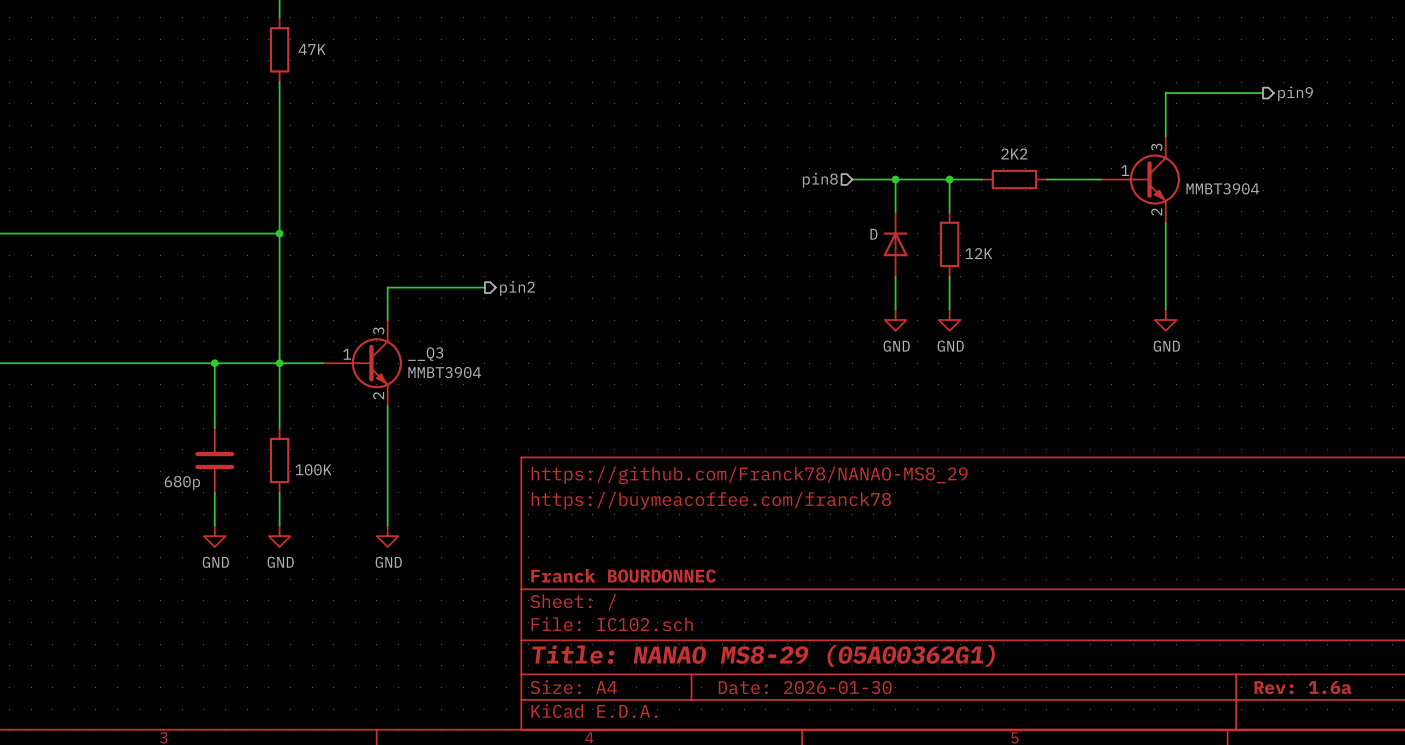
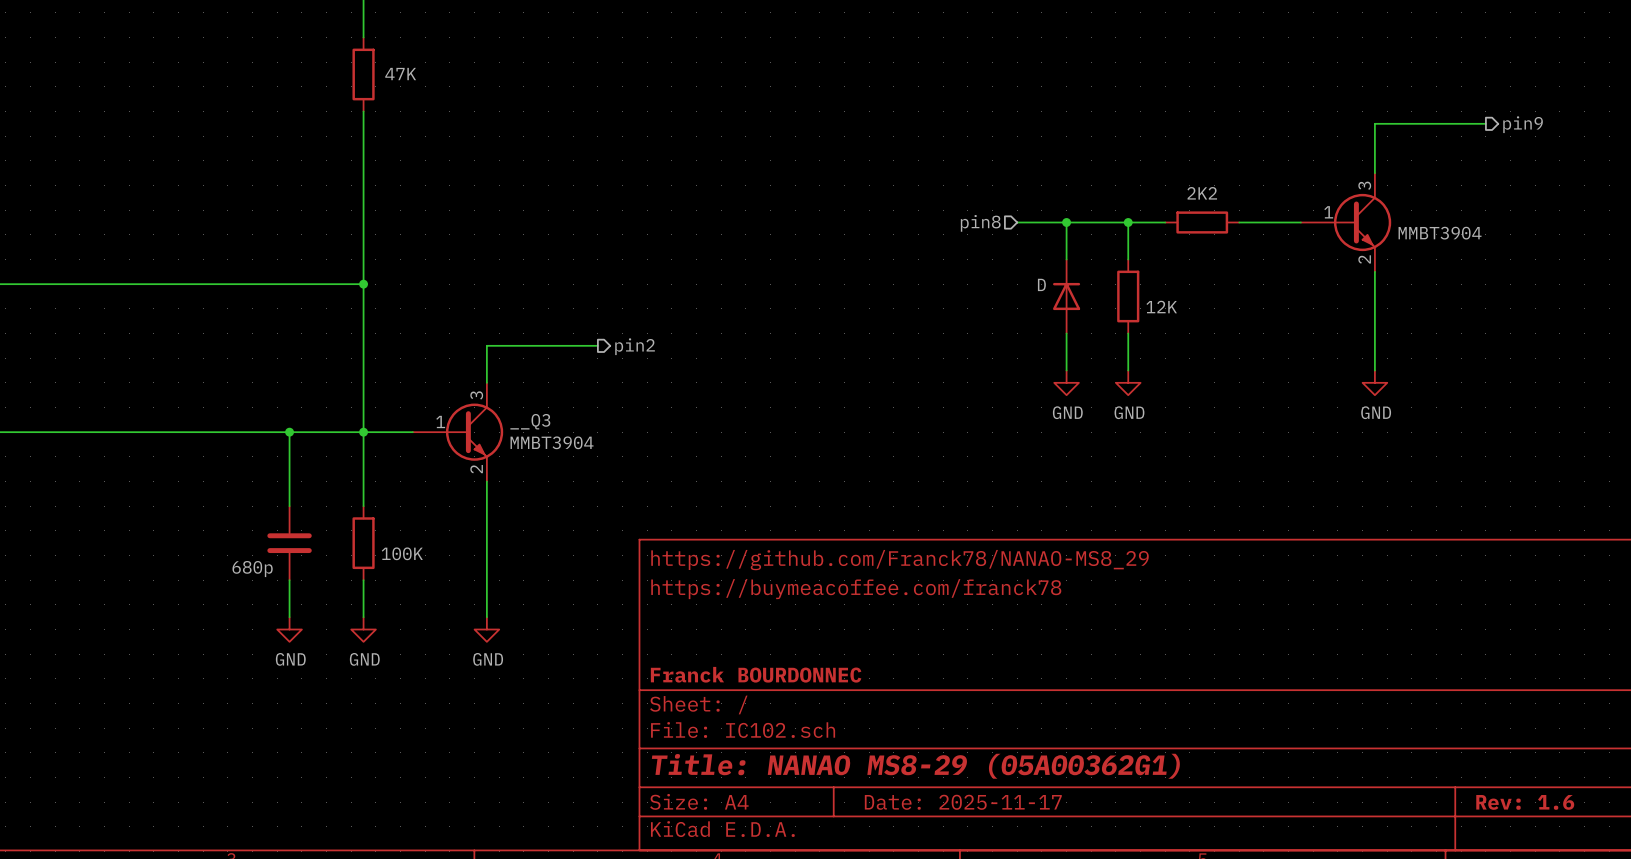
title block: Date: 2026-01-30 (805, 687) -> Date: 2025-11-17 (963, 802)
title block: Rev: 1.6a (1302, 687) -> Rev: 1.6 (1525, 802)

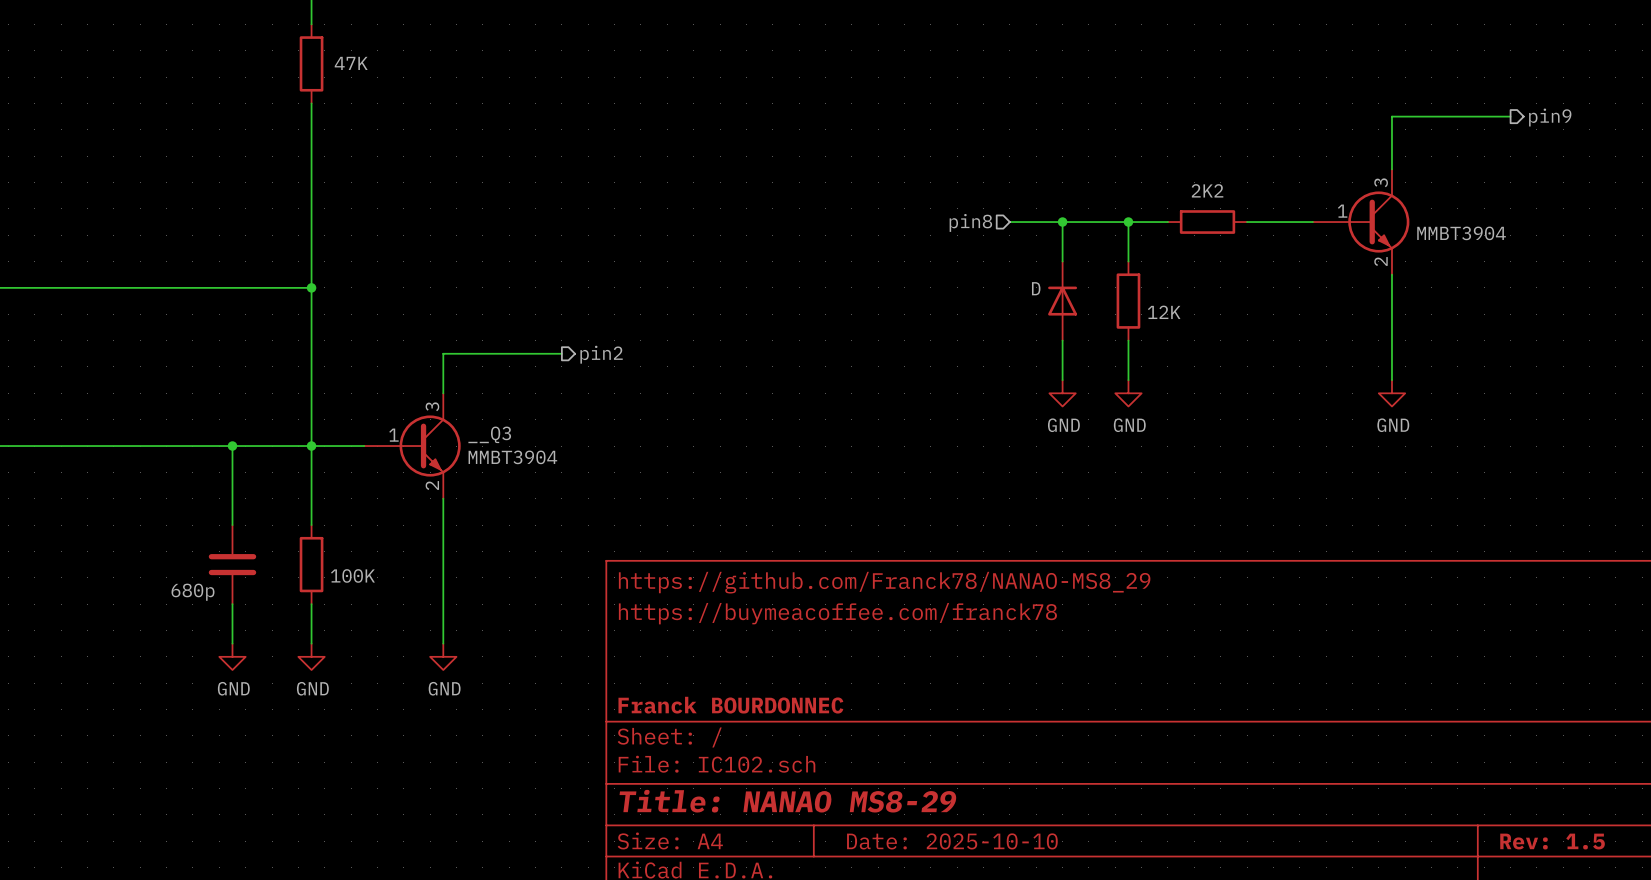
title block: Title: NANAO MS8-29 (05A00362G1) (915, 766) -> Title: NANAO MS8-29 (787, 801)
title block: Date: 2025-11-17 (963, 802) -> Date: 2025-10-10 (952, 841)
title block: Rev: 1.6 (1525, 802) -> Rev: 1.5 (1552, 841)

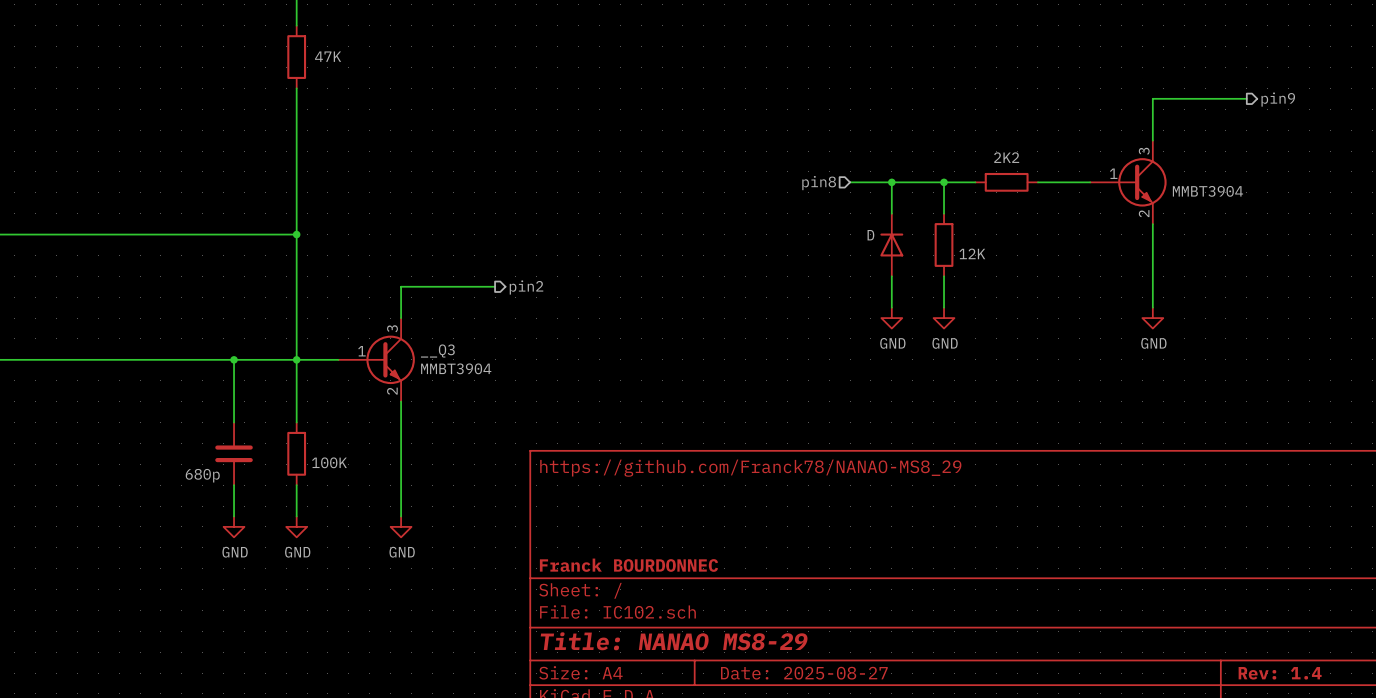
title block: https://buymeacoffee.com/franck78 (837, 613) -> none
title block: Date: 2025-10-10 (952, 841) -> Date: 2025-08-27 (804, 673)
title block: Rev: 1.5 (1552, 841) -> Rev: 1.4 (1280, 673)

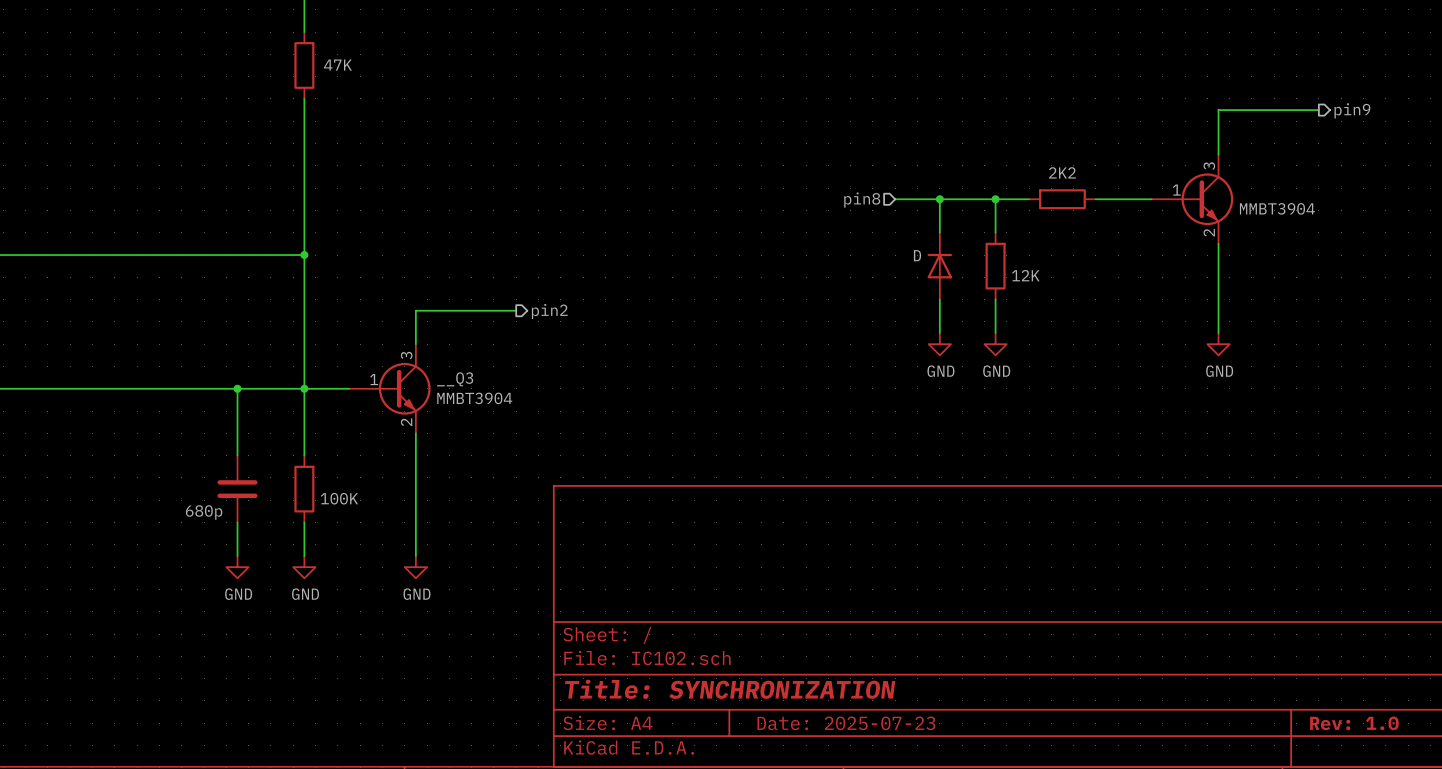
title block: https://github.com/Franck78/NANAO-MS8_29 (750, 468) -> none
title block: Franck BOURDONNEC (628, 565) -> none
title block: Title: NANAO MS8-29 (674, 641) -> Title: SYNCHRONIZATION (730, 689)
title block: Date: 2025-08-27 (804, 673) -> Date: 2025-07-23 (846, 723)
title block: Rev: 1.4 (1280, 673) -> Rev: 1.0 (1354, 723)

